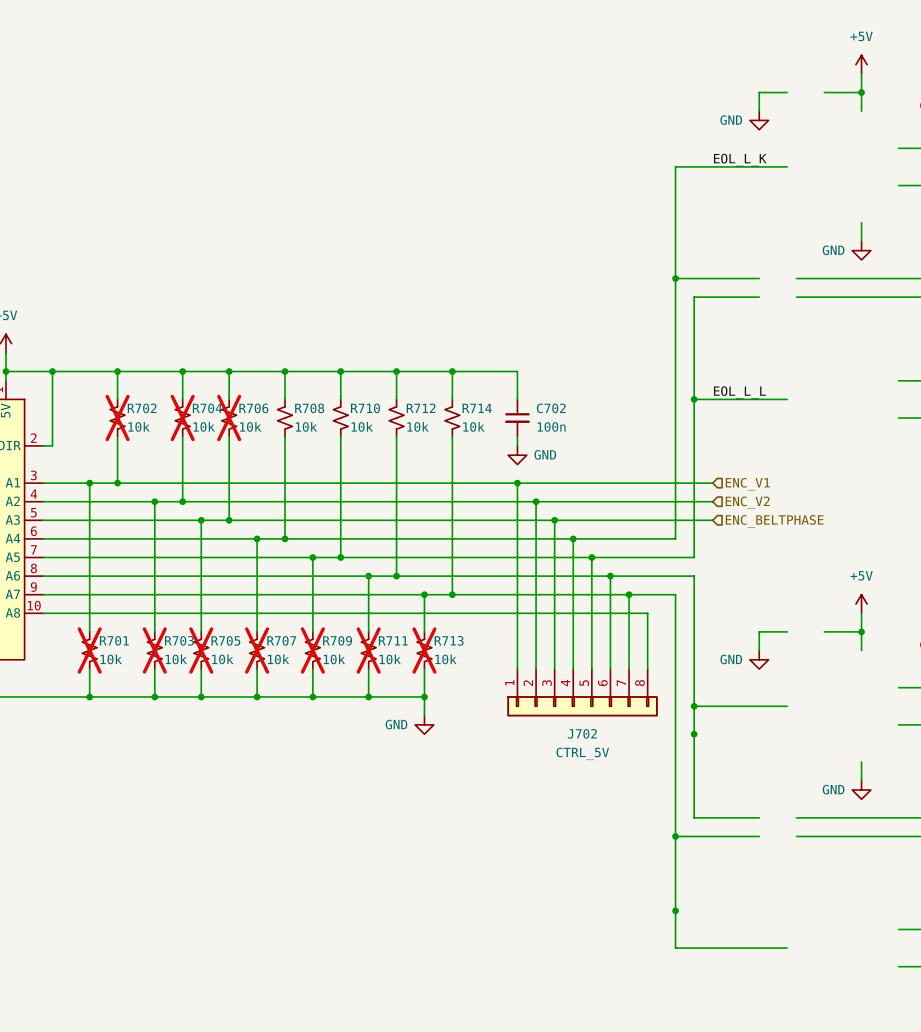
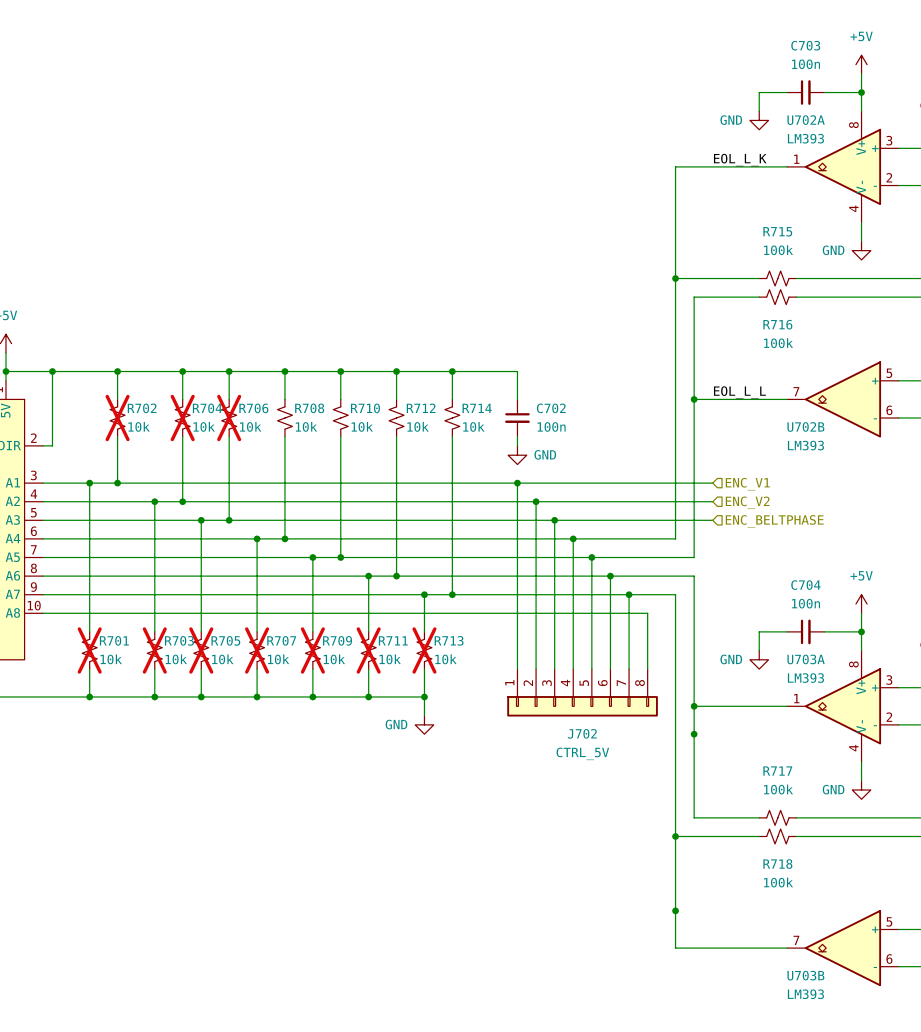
C703: none -> 100n (805, 92)
U702A: none -> LM393 (842, 166)
part: none -> (861, 166)
R715: none -> 100k (777, 278)
R716: none -> 100k (777, 297)
U702B: none -> LM393 (842, 399)
C704: none -> 100n (805, 631)
U703A: none -> LM393 (842, 706)
part: none -> (861, 706)
R717: none -> 100k (777, 817)
R718: none -> 100k (777, 836)
U703B: none -> LM393 (842, 948)

